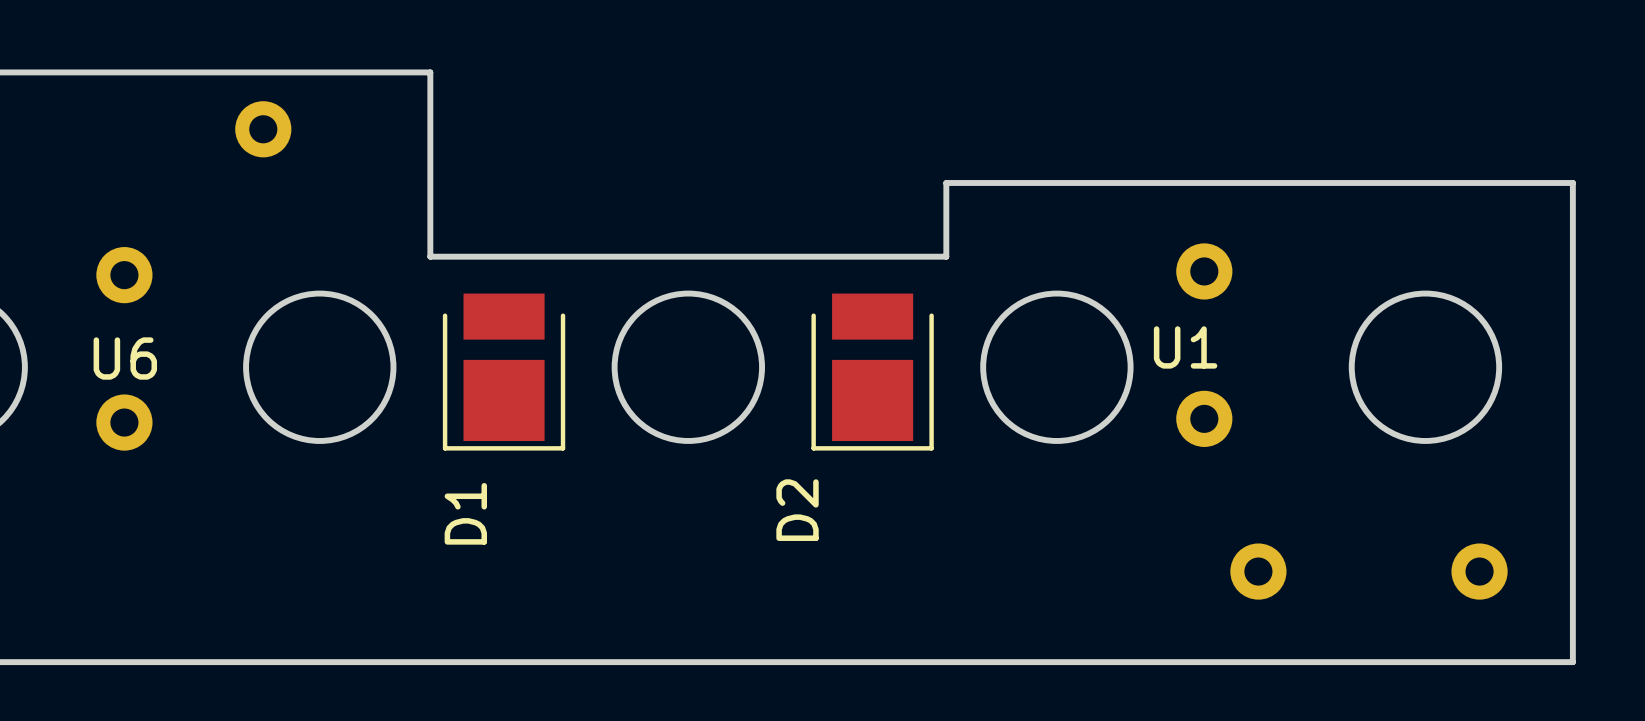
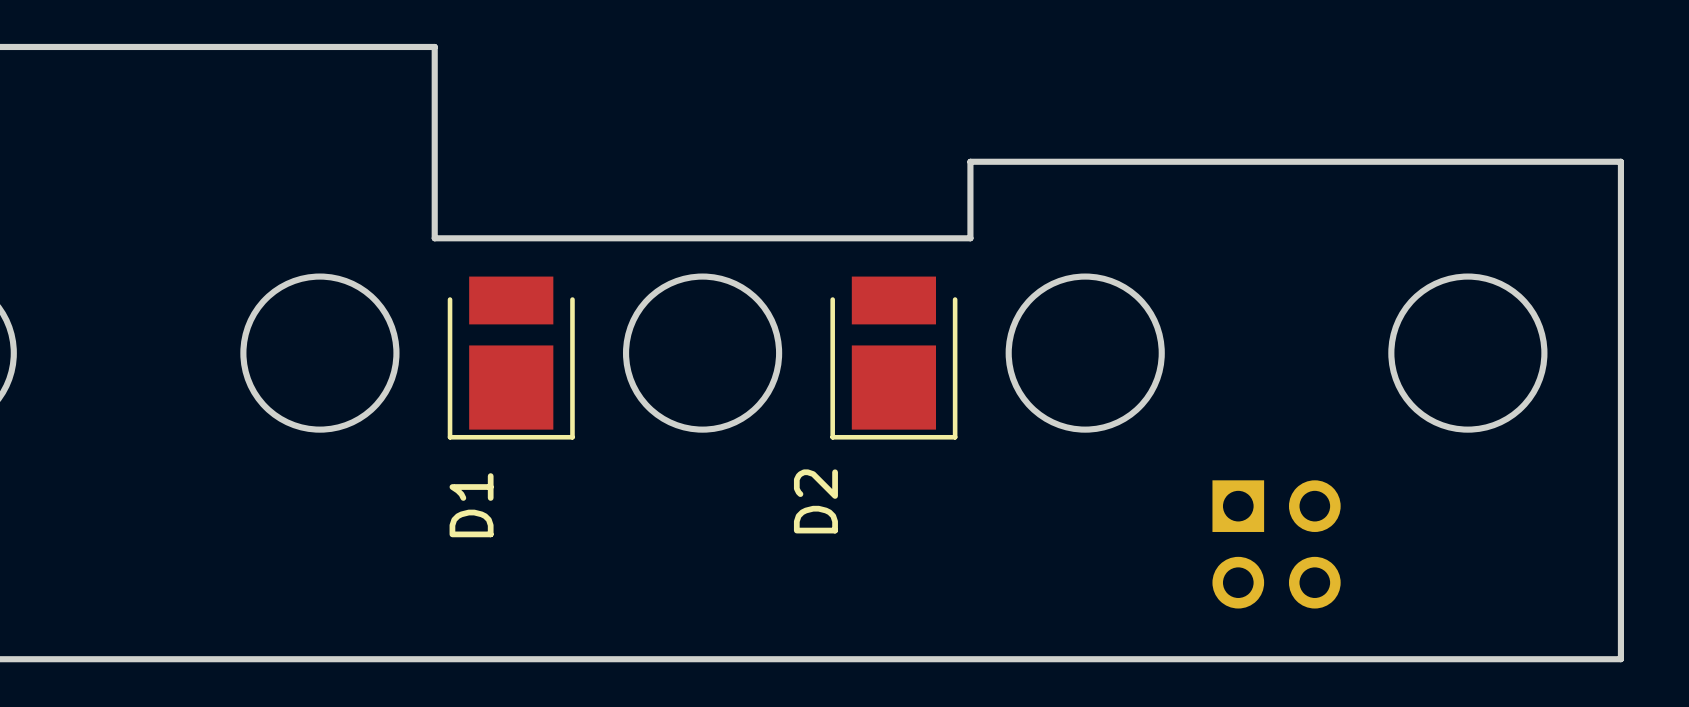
part: (263, 129) -> none
U1: (1204, 345) -> none
U6: (124, 348) -> none
part footprint: [1230, 543, 1287, 600] -> [1212, 480, 1341, 609]
part: (1479, 571) -> none

